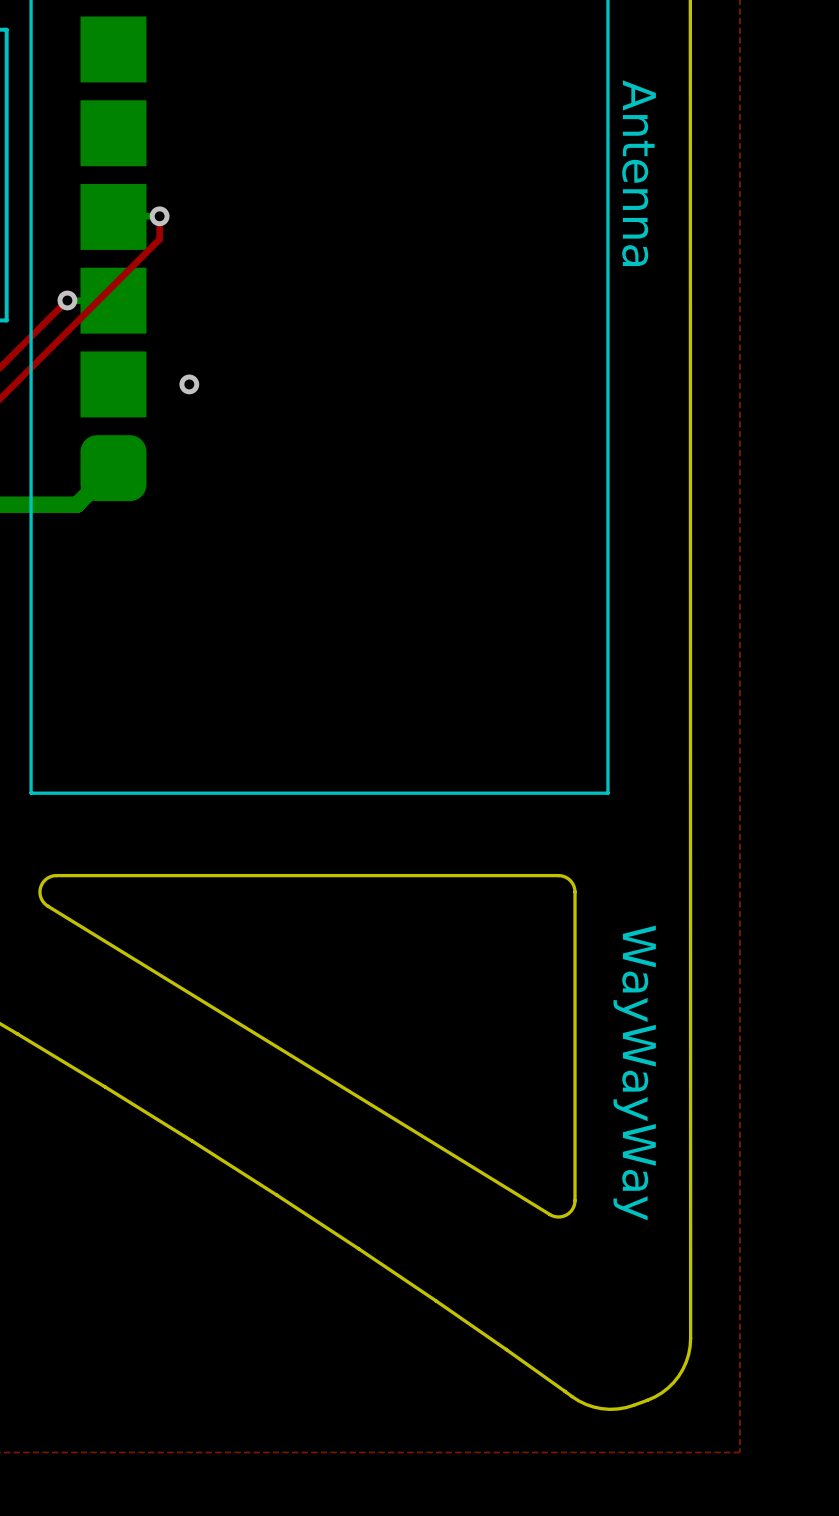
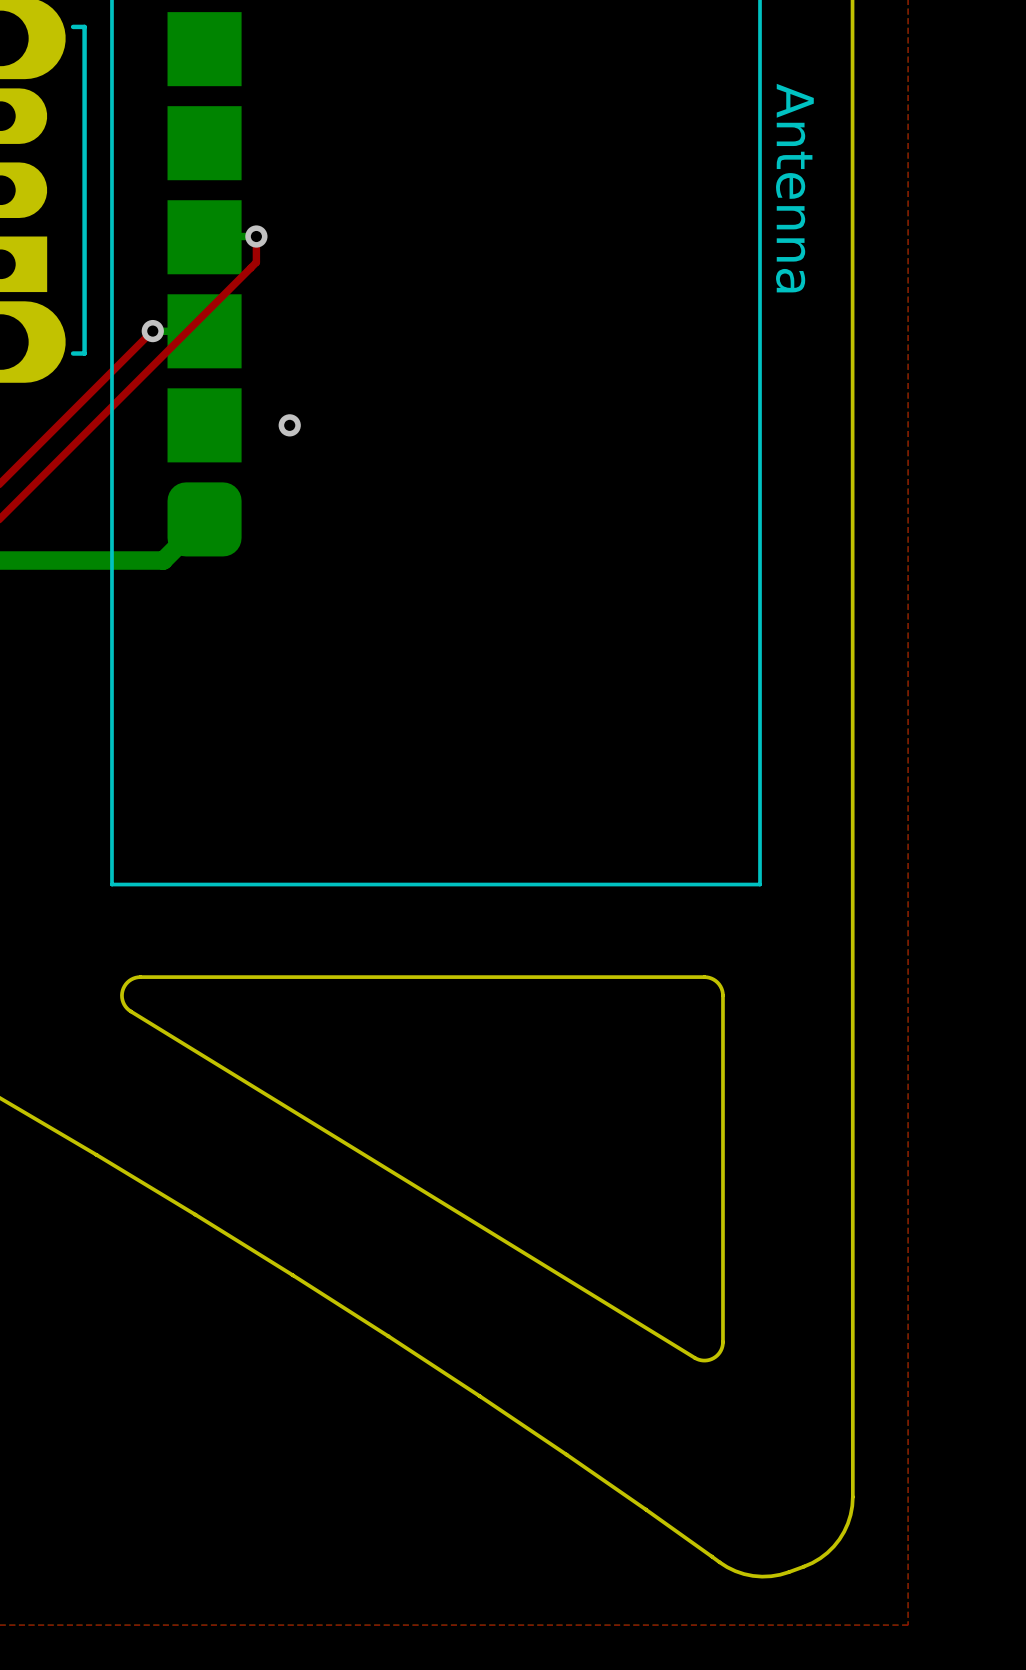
text: WayWayWay (634, 1073) -> none

